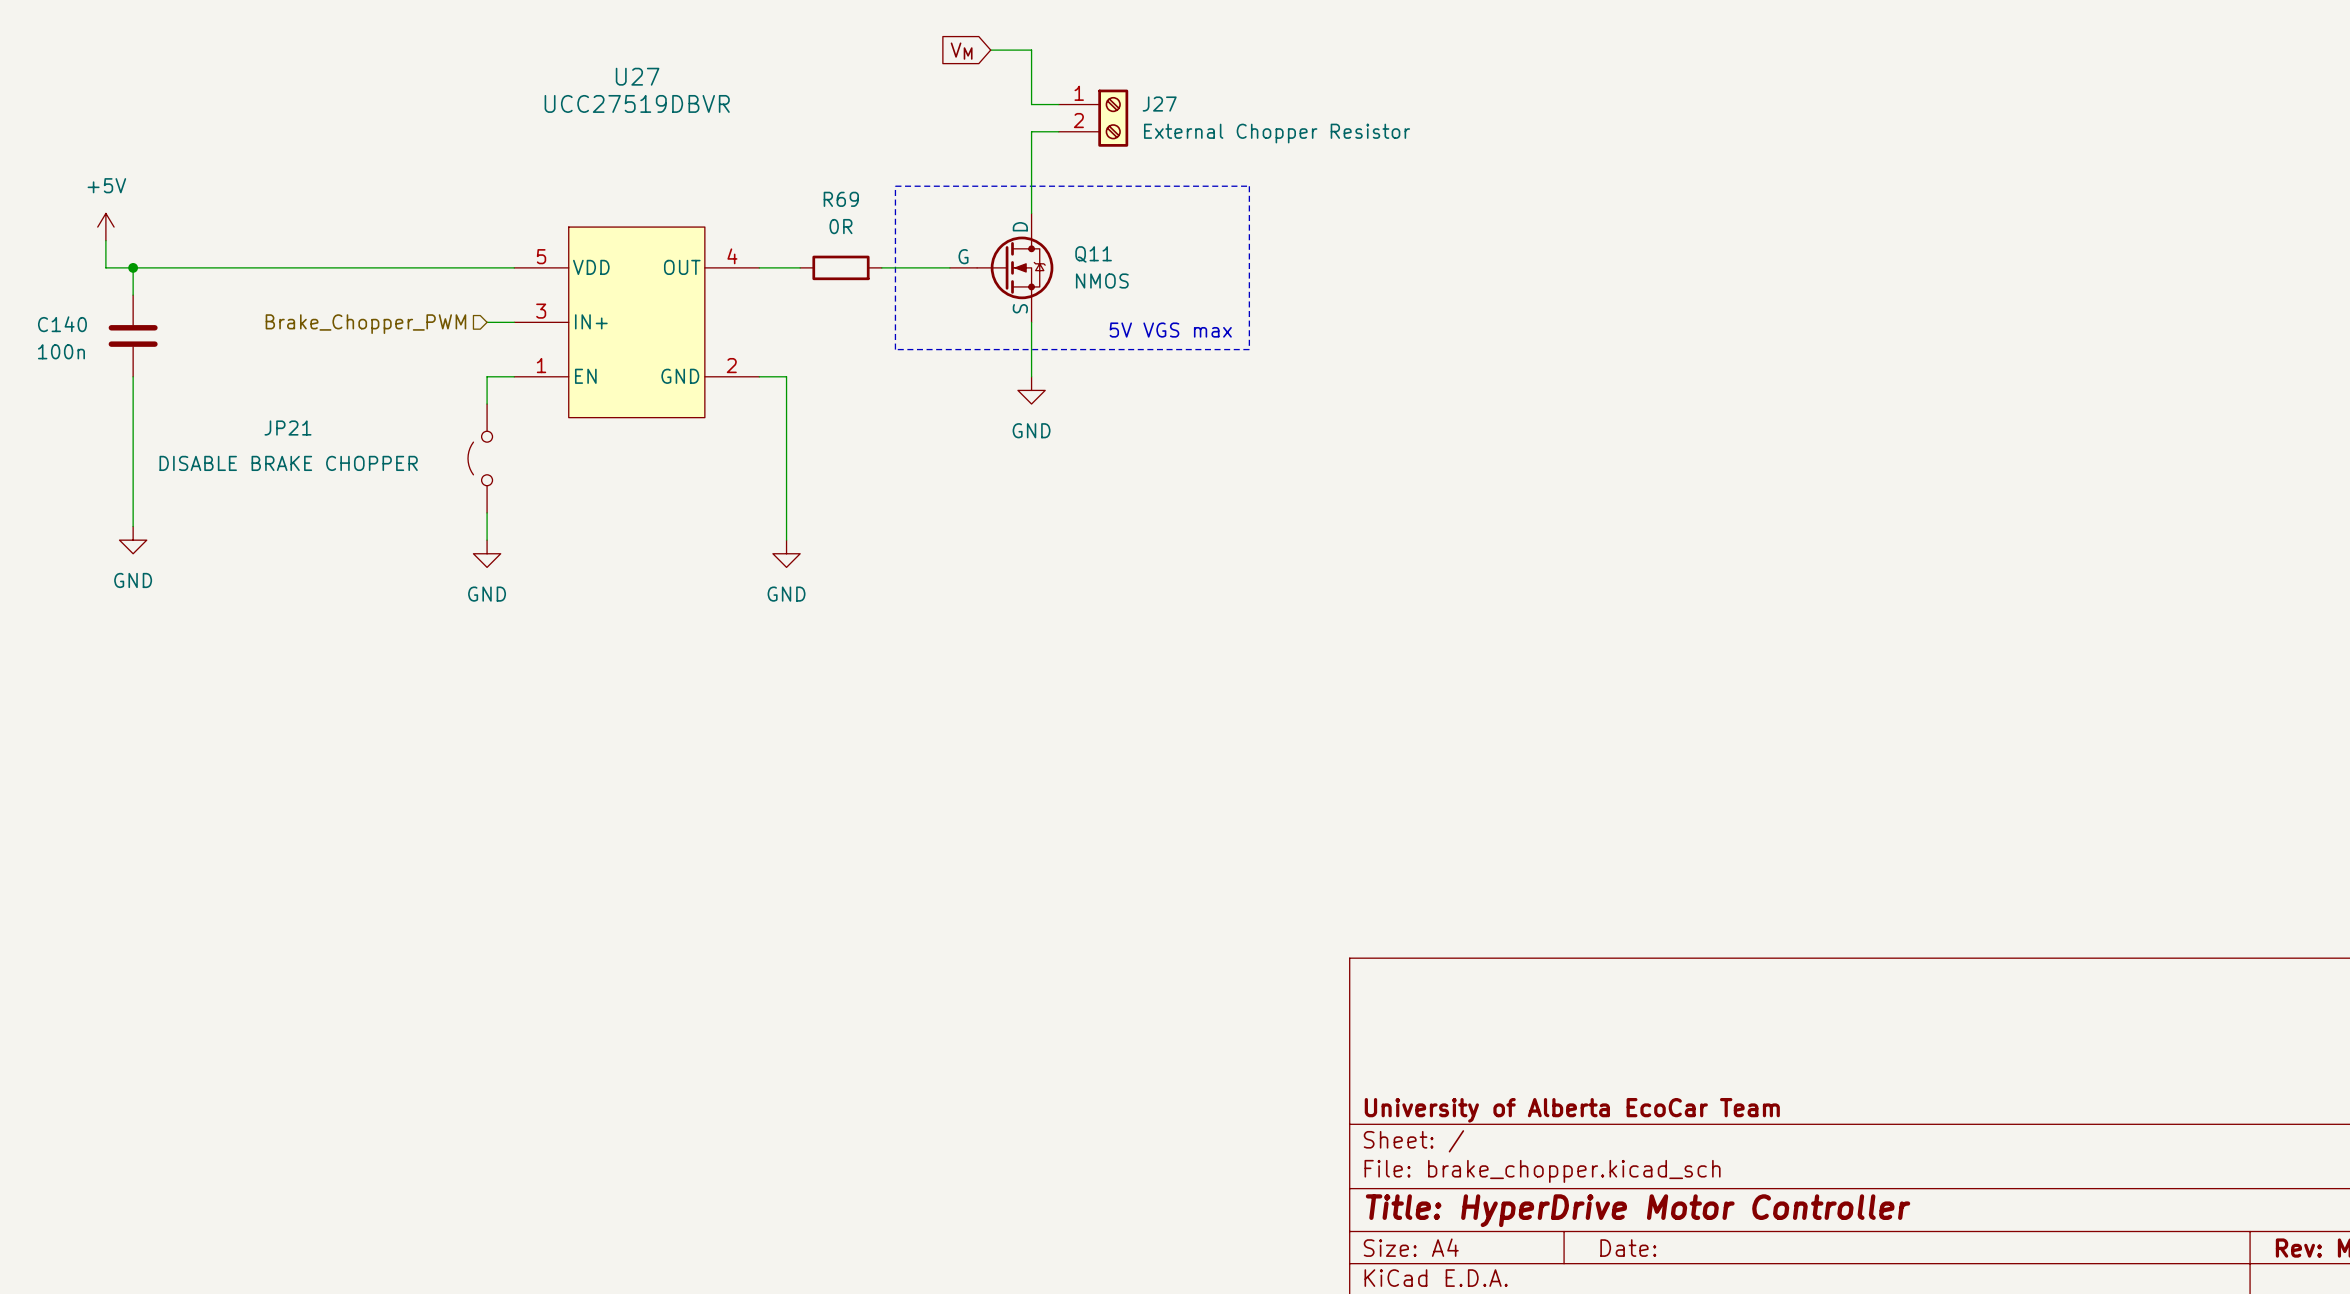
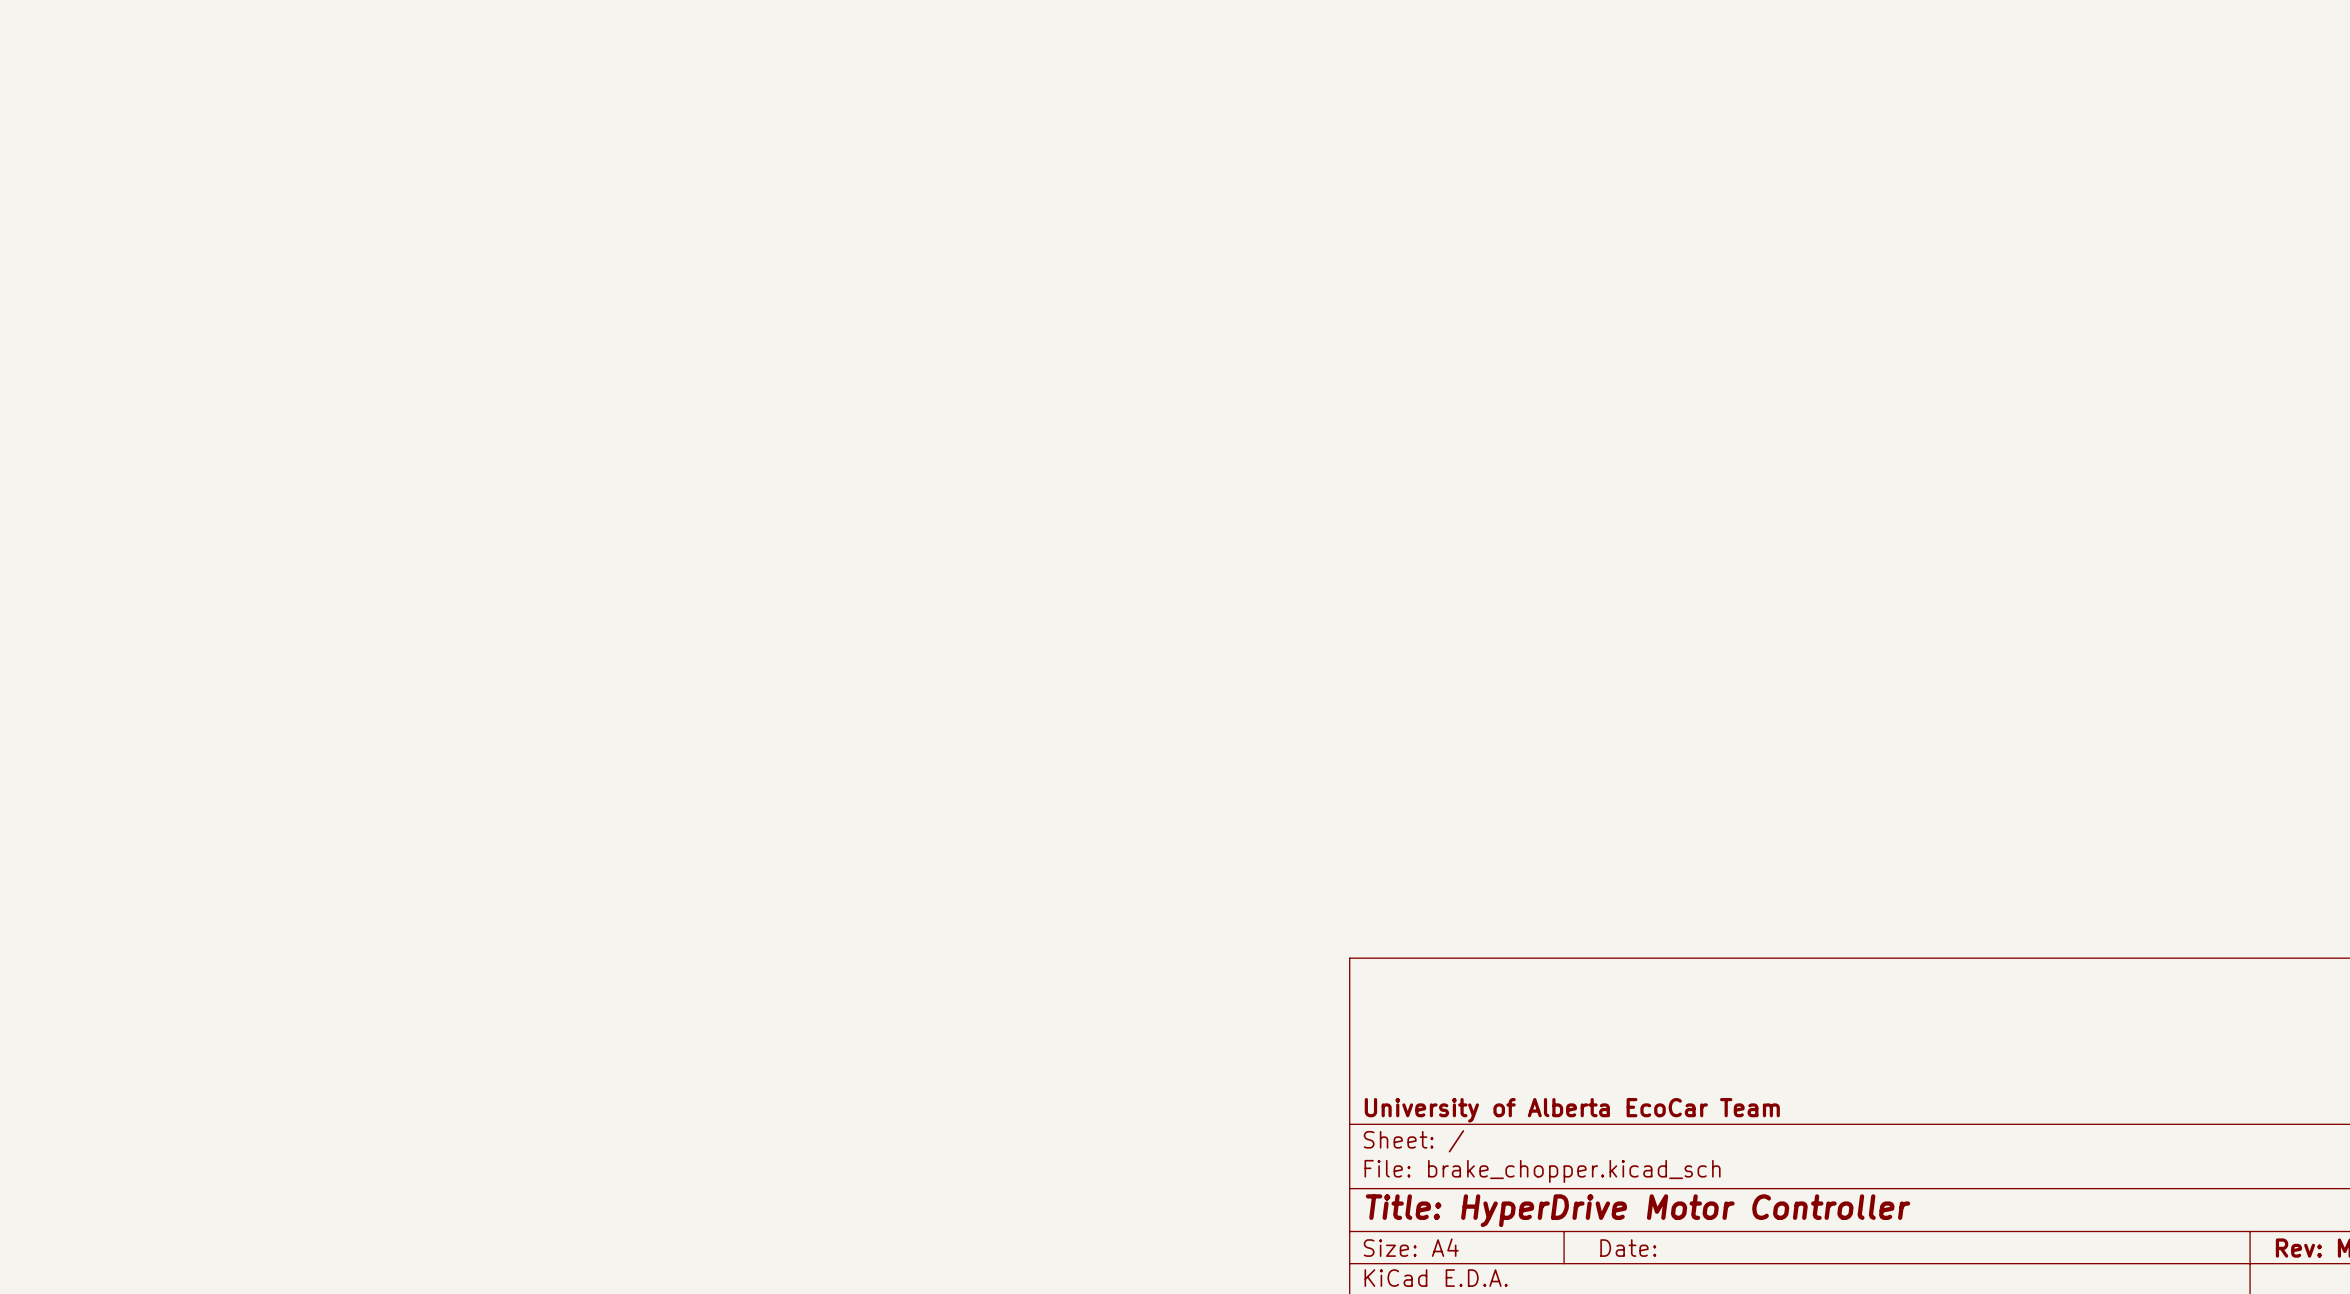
wire: (990, 50) (1031, 50) (1031, 104) (1058, 104) -> none
global label: VM (961, 51) -> none
J27: External Chopper Resistor (1093, 118) -> none
wire: (1058, 131) (1031, 131) (1031, 213) -> none
line: (895, 186) (1249, 186) (1249, 349) (895, 349) (895, 186) -> none
power symbol: +5V (105, 227) -> none
wire: (105, 240) (105, 267) (514, 267) -> none
wire: (133, 267) (133, 295) -> none
junction: (133, 267) -> none
wire: (759, 267) (800, 267) -> none
R69: 0R (840, 267) -> none
wire: (881, 267) (949, 267) -> none
Q11: NMOS (1001, 267) -> none
wire: (487, 322) (514, 322) -> none
U27: UCC27519DBVR (636, 322) -> none
wire: (1031, 322) (1031, 376) -> none
hierarchical label: Brake_Chopper_PWM (365, 324) -> none
text: 5V VGS max (1170, 330) -> none
C140: 100n (133, 335) -> none
wire: (133, 376) (133, 526) -> none
wire: (514, 376) (487, 376) (487, 404) -> none
wire: (759, 376) (786, 376) (786, 540) -> none
power symbol: GND (1031, 390) -> none
JP21: DISABLE BRAKE CHOPPER (480, 458) -> none
wire: (487, 512) (487, 540) -> none
power symbol: GND (133, 540) -> none
power symbol: GND (487, 553) -> none
power symbol: GND (786, 553) -> none

